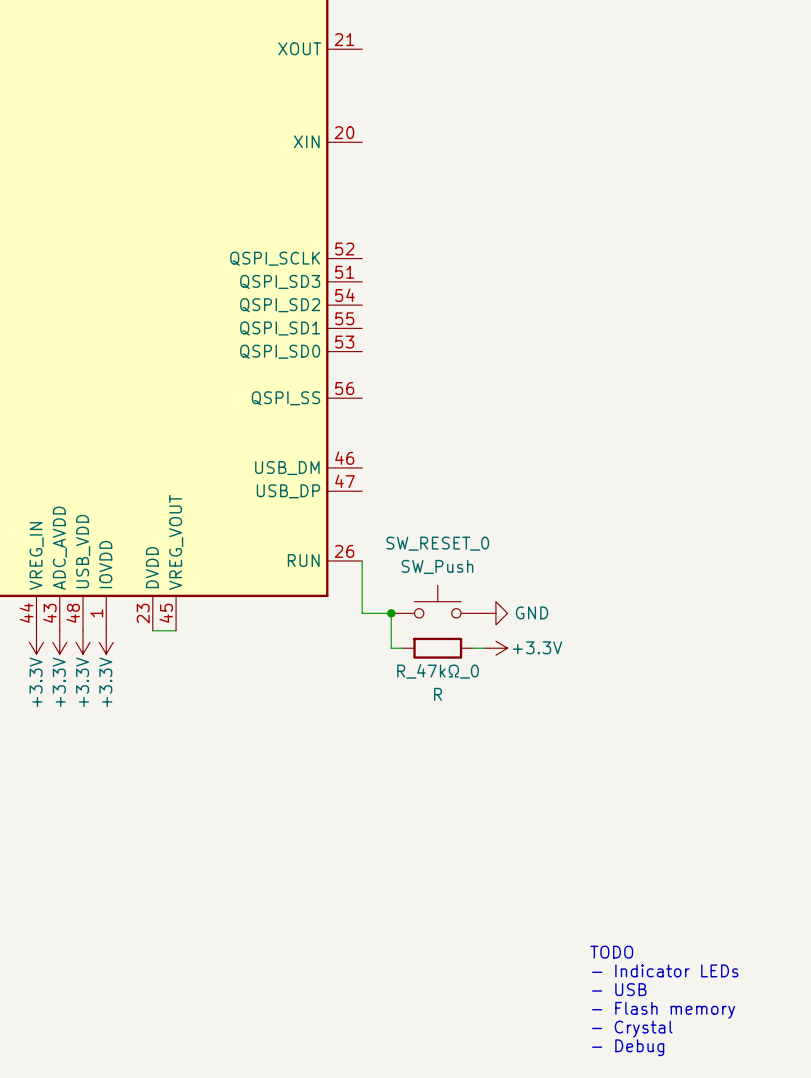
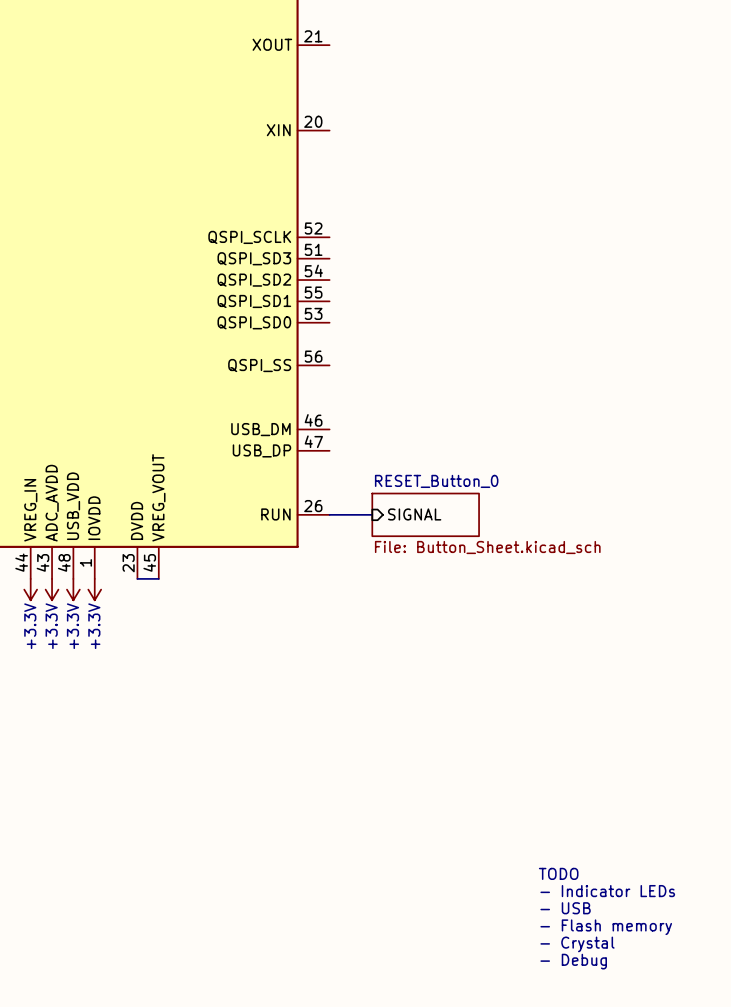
sheet pin: none -> SIGNAL (414, 514)
wire: (362, 561) (362, 613) (391, 613) (391, 648) (402, 648) -> (329, 514) (372, 514)
sheet RESET_Button_0: none -> File: Button_Sheet.kicad_sch (425, 514)
SW_RESET_0: SW_Push (437, 601) -> none
junction: (391, 613) -> none
power symbol: GND (495, 613) -> none
R_47kΩ_0: R (437, 648) -> none
wire: (472, 648) (484, 648) -> none
power symbol: +3.3V (495, 648) -> none

